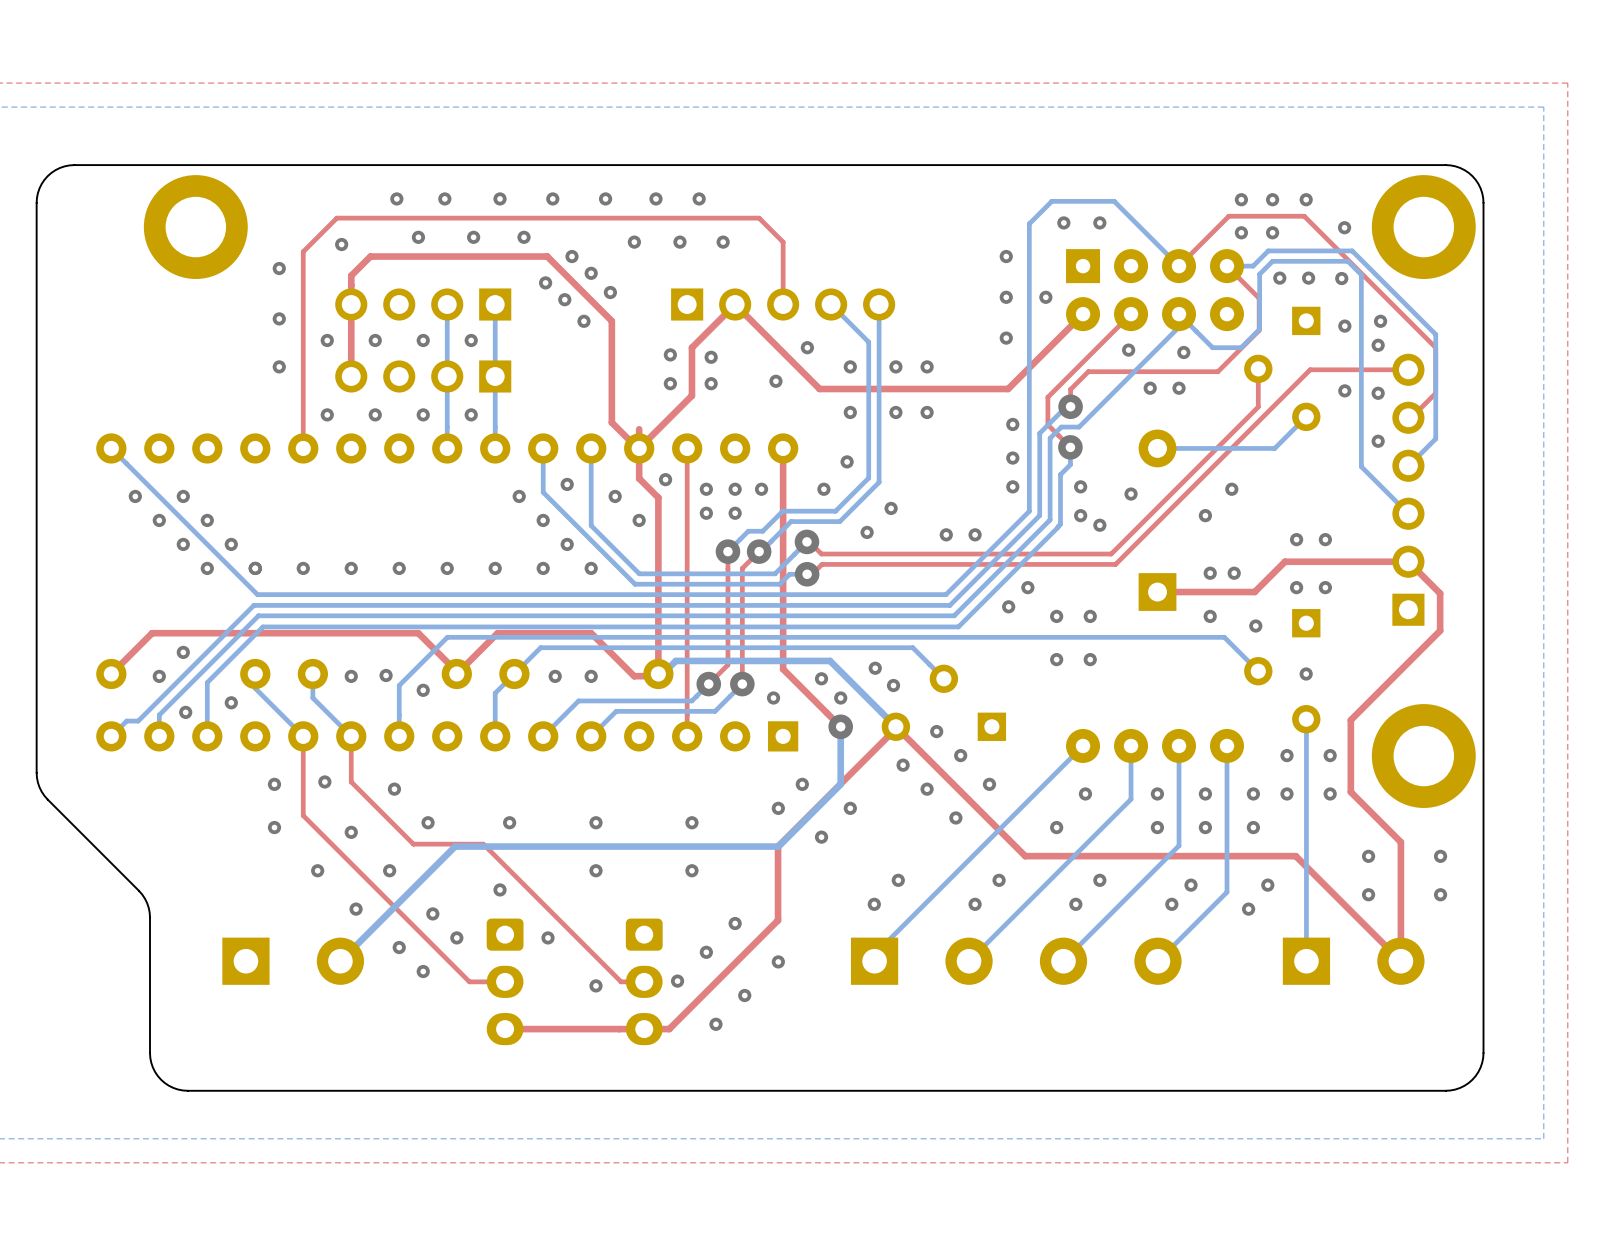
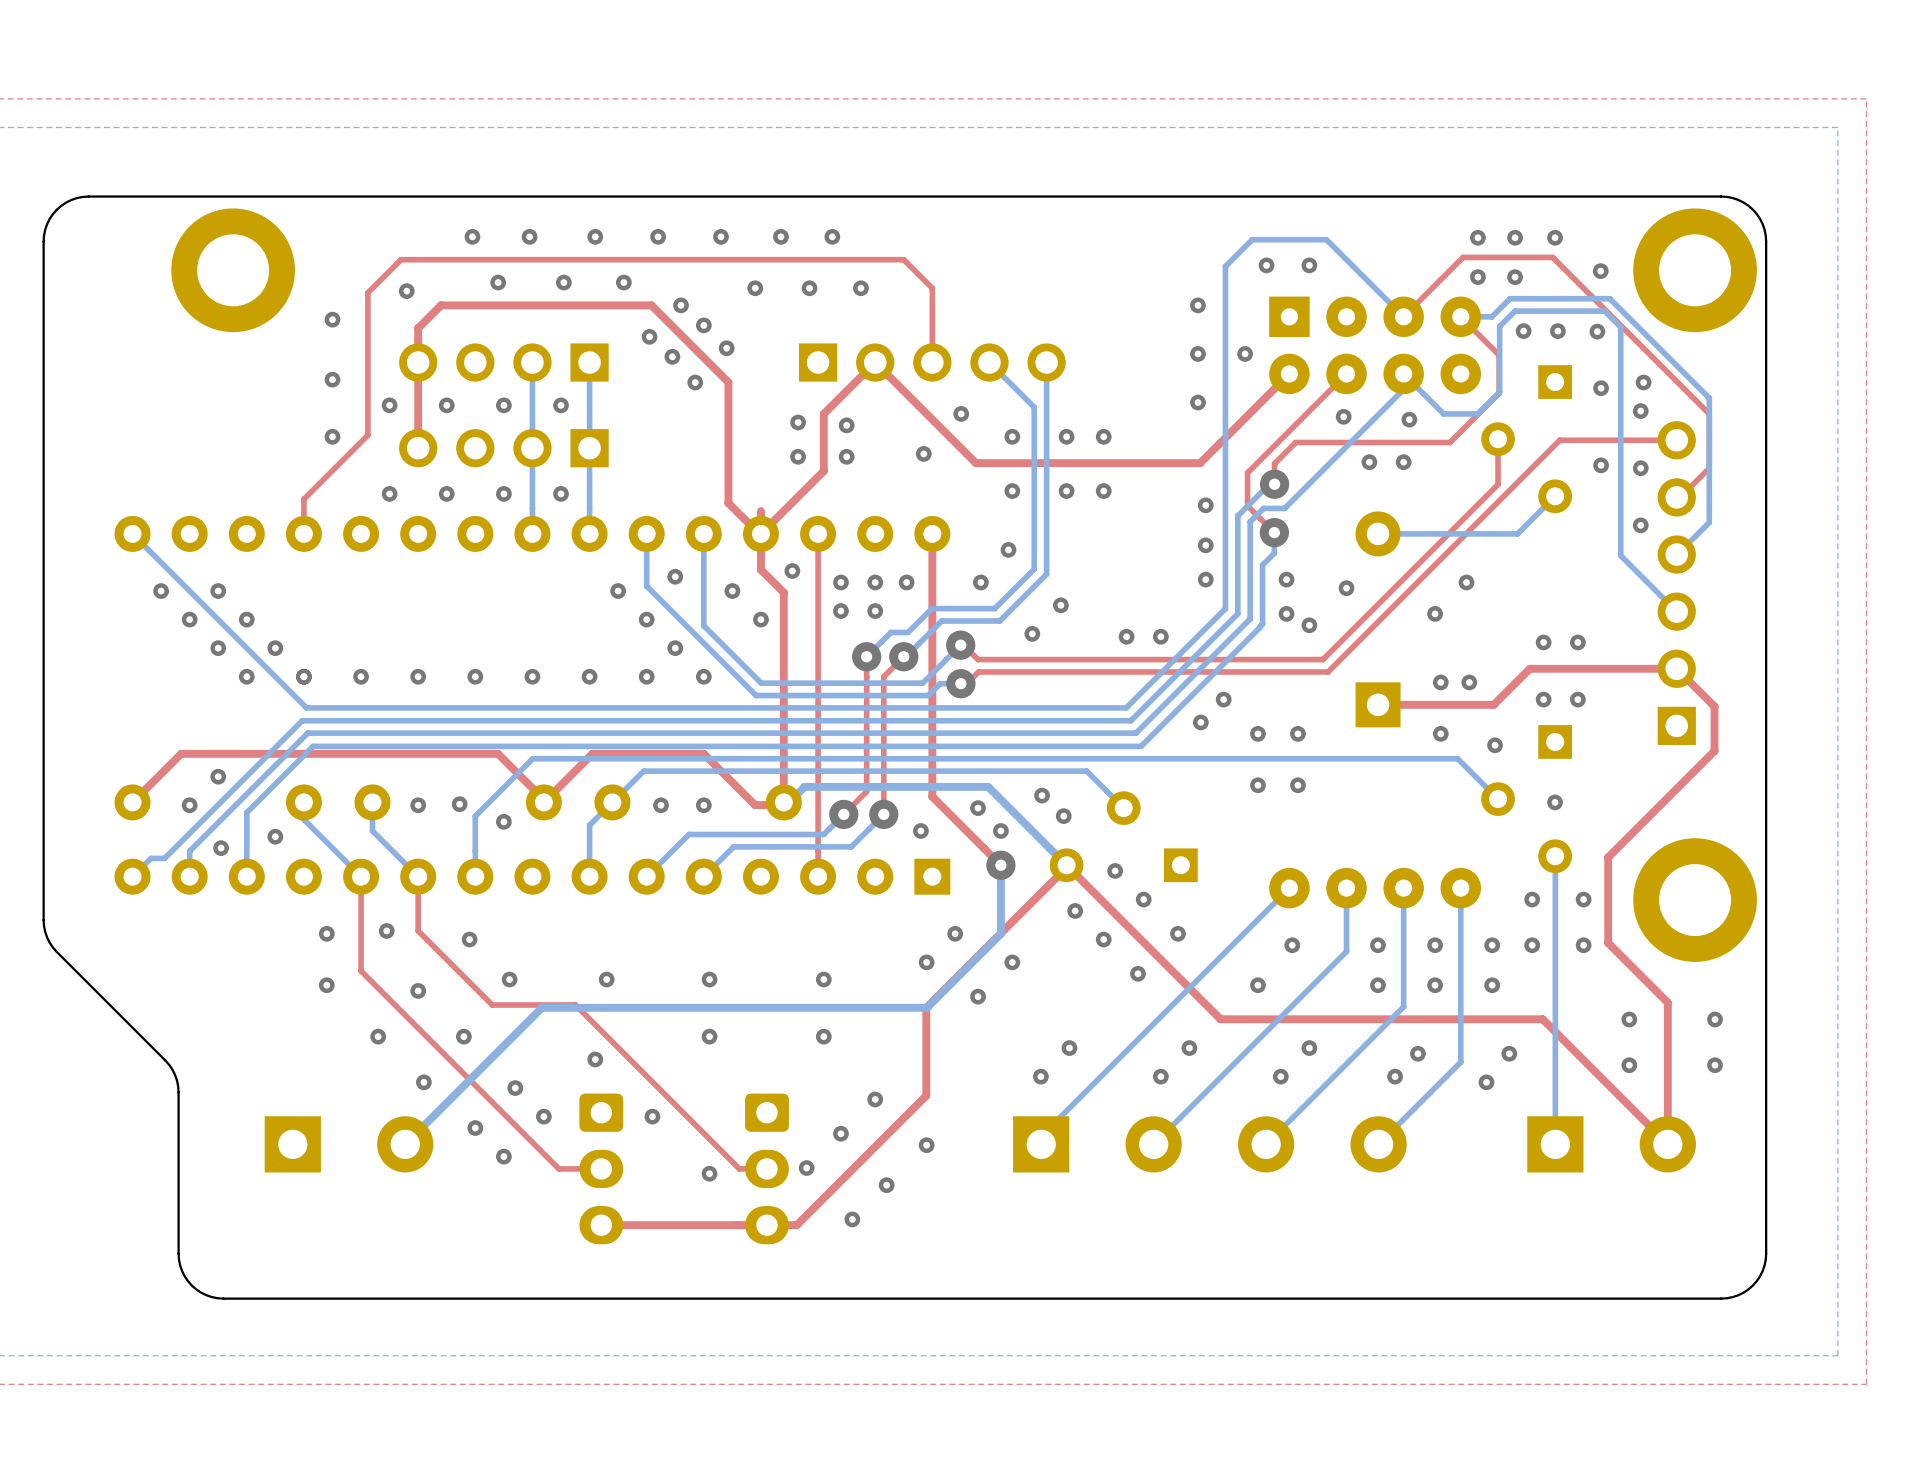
top track: (309, 245) (303, 251) (303, 448) -> (367, 292) (367, 435) (303, 499) (303, 533)

